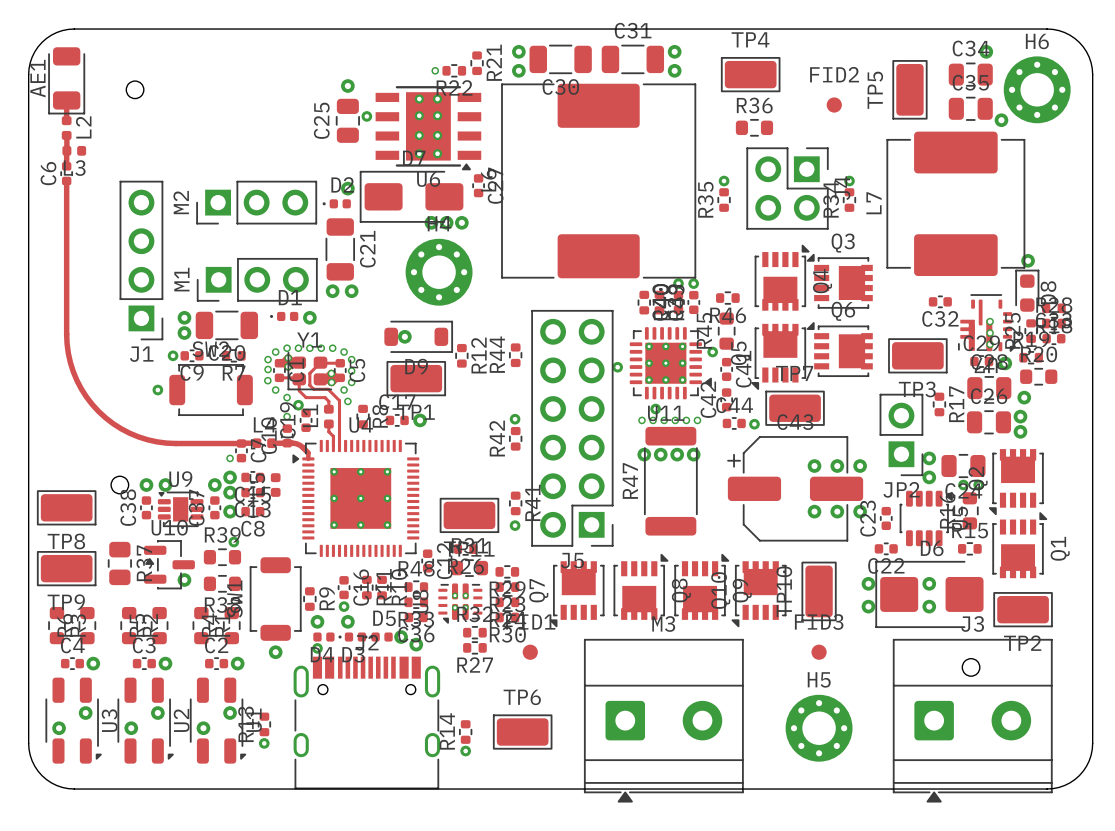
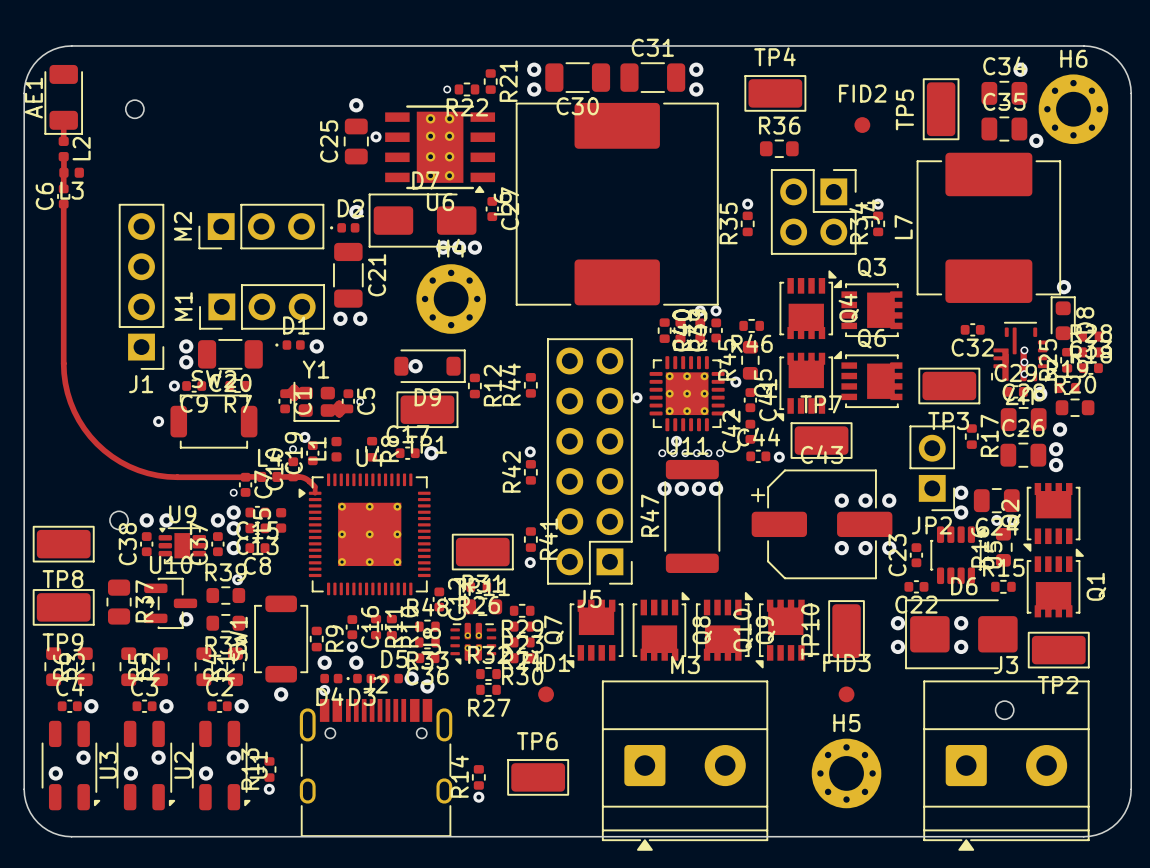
via: (287, 348) -> none
via: (298, 348) -> none
via: (309, 348) -> none
via: (321, 348) -> none
via: (332, 348) -> none
via: (275, 352) -> none
via: (344, 352) -> none
via: (288, 358) -> none
via: (268, 359) -> none
via: (351, 359) -> none
track: (340, 363) (320, 362) (309, 373) (309, 385) (313, 389) (328, 389) (339, 400) (339, 445) -> none
via: (288, 366) -> none
via: (268, 369) -> none
via: (331, 373) -> none
track: (279, 377) (297, 377) (299, 390) (306, 397) (325, 397) (328, 401) (328, 409) -> none
via: (267, 380) -> none
via: (331, 382) -> none
via: (351, 382) -> none
via: (275, 390) -> none
via: (344, 390) -> none
via: (287, 397) -> none
via: (347, 401) -> none
track: (328, 423) (328, 431) (333, 436) (333, 445) -> none

